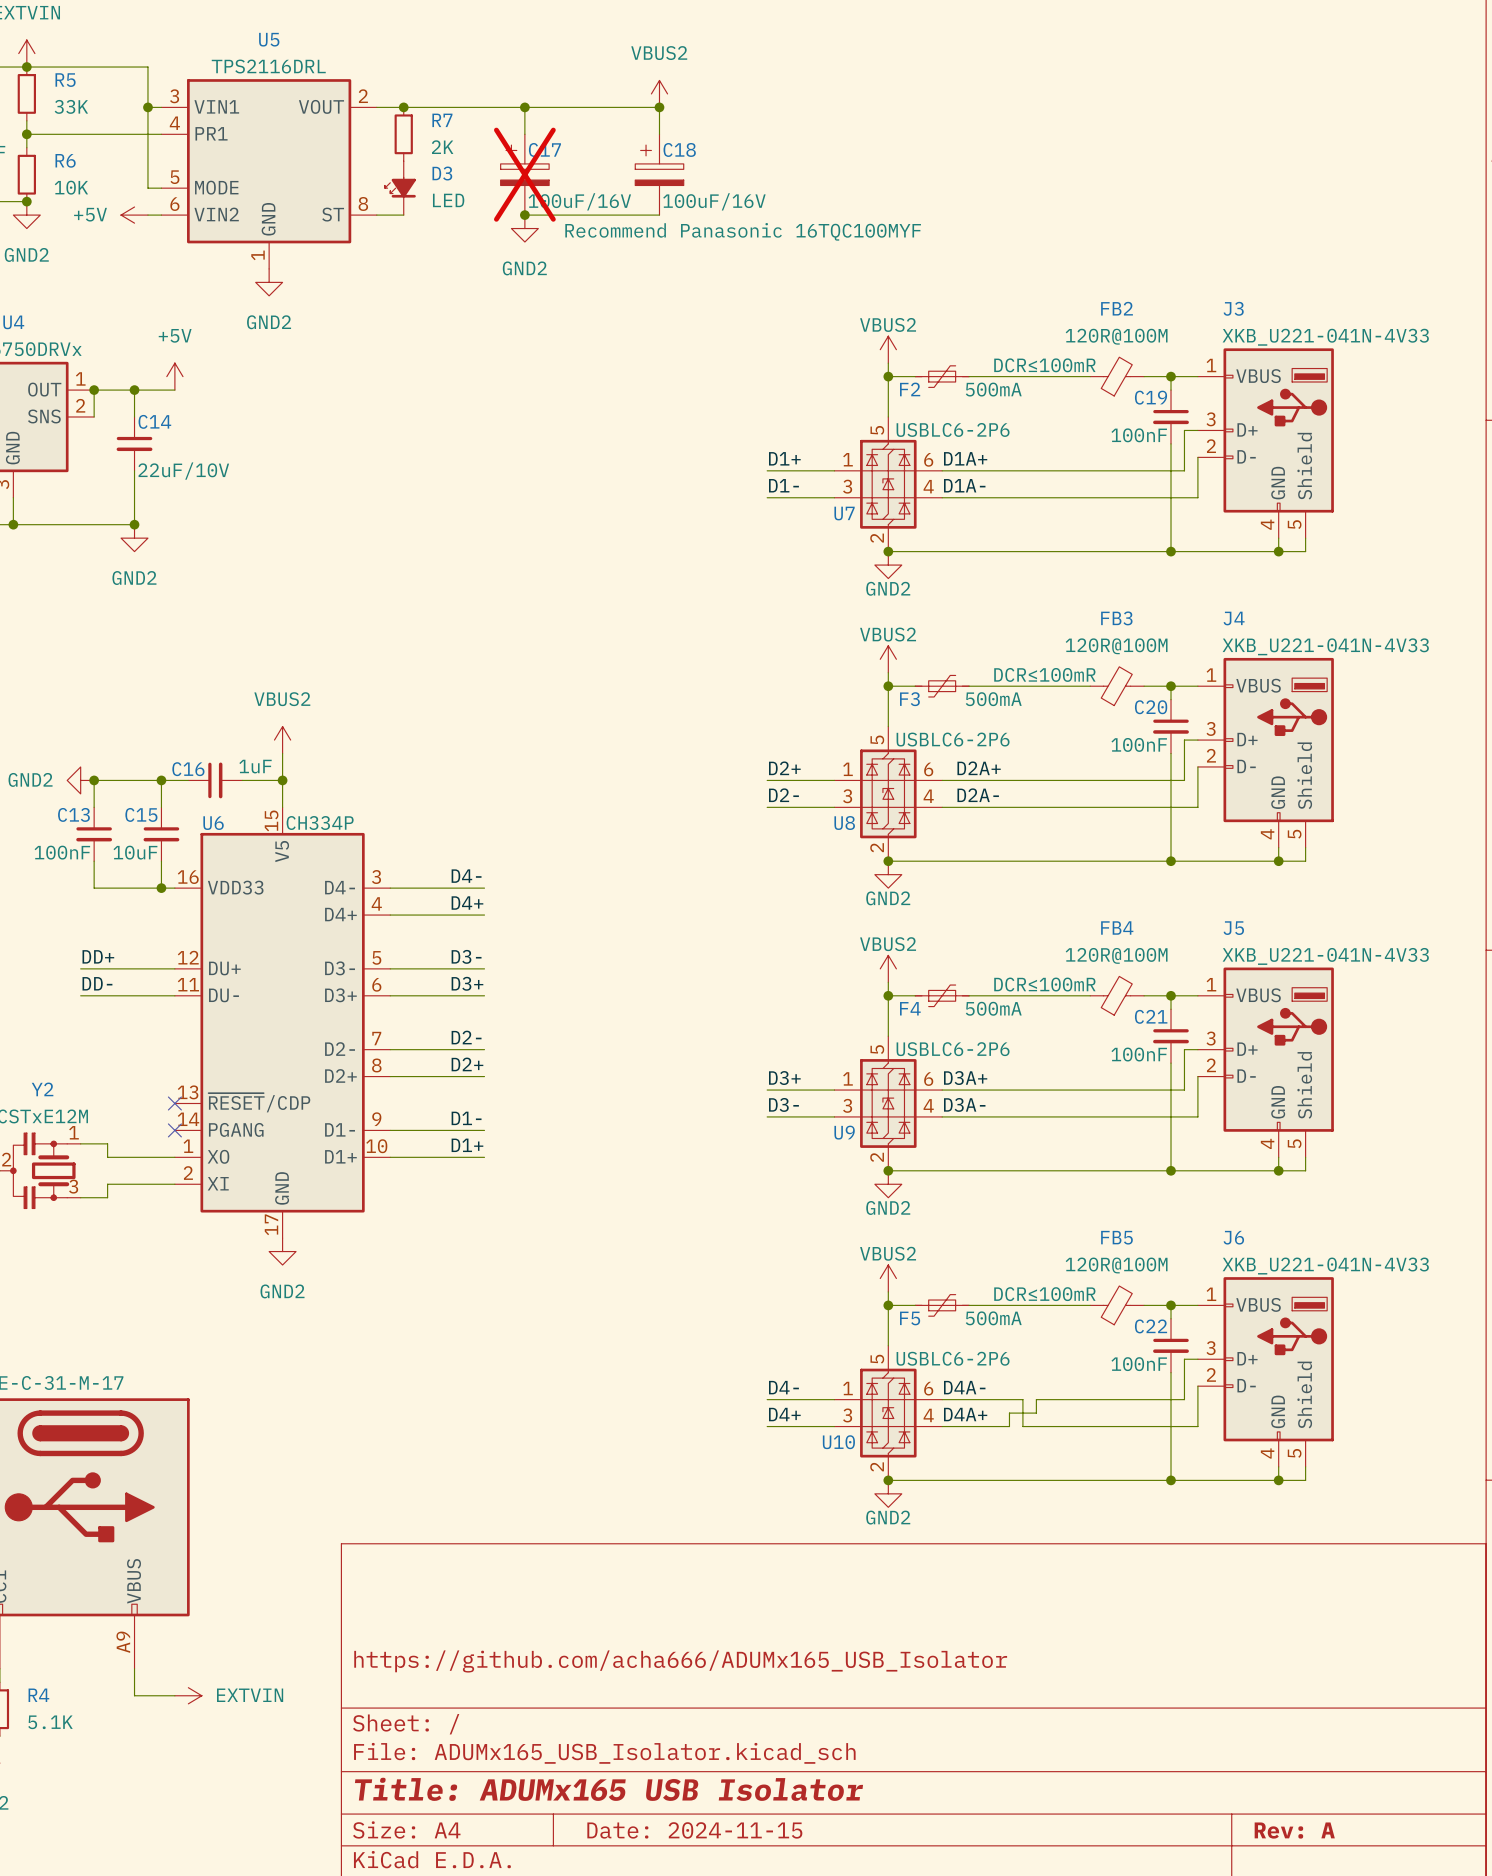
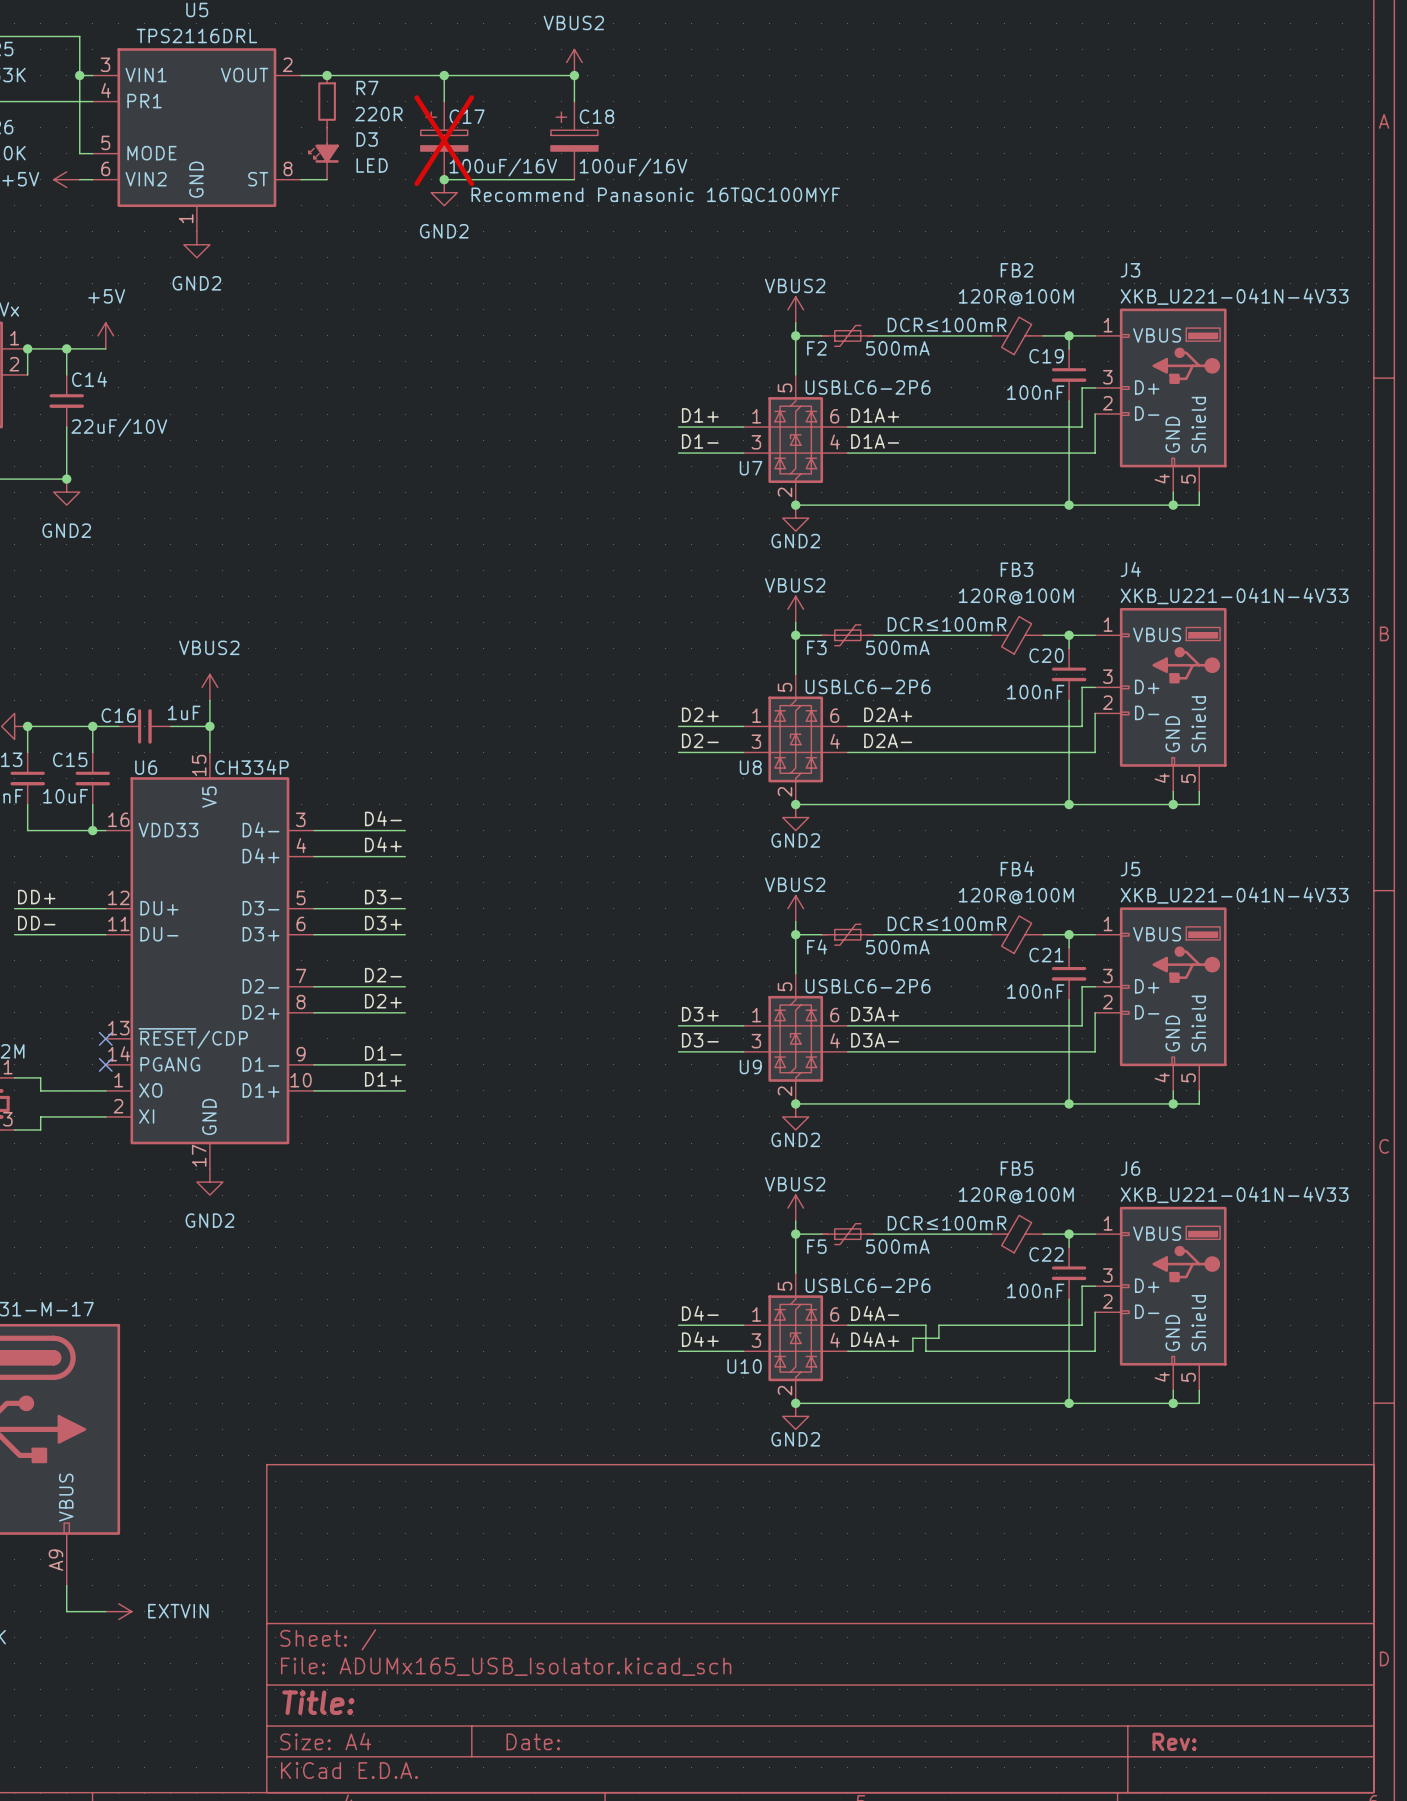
R7 value: 2K (442, 147) -> 220R (378, 114)
title block: https://github.com/acha666/ADUMx165_USB_Isolator (680, 1661) -> none
title block: Title: ADUMx165 USB Isolator (608, 1789) -> Title: (318, 1702)
title block: Date: 2024-11-15 (694, 1830) -> Date: (533, 1741)
title block: Rev: A (1294, 1830) -> Rev: (1174, 1741)

